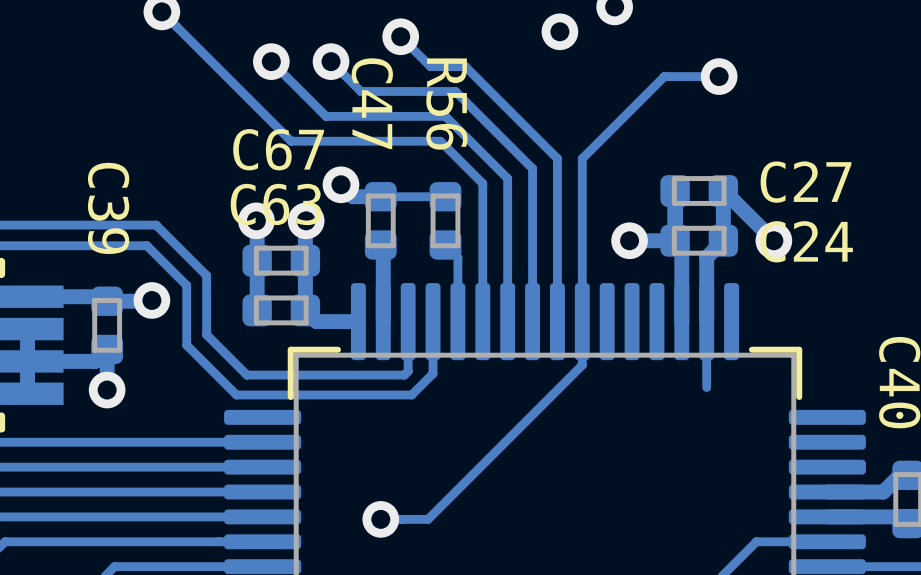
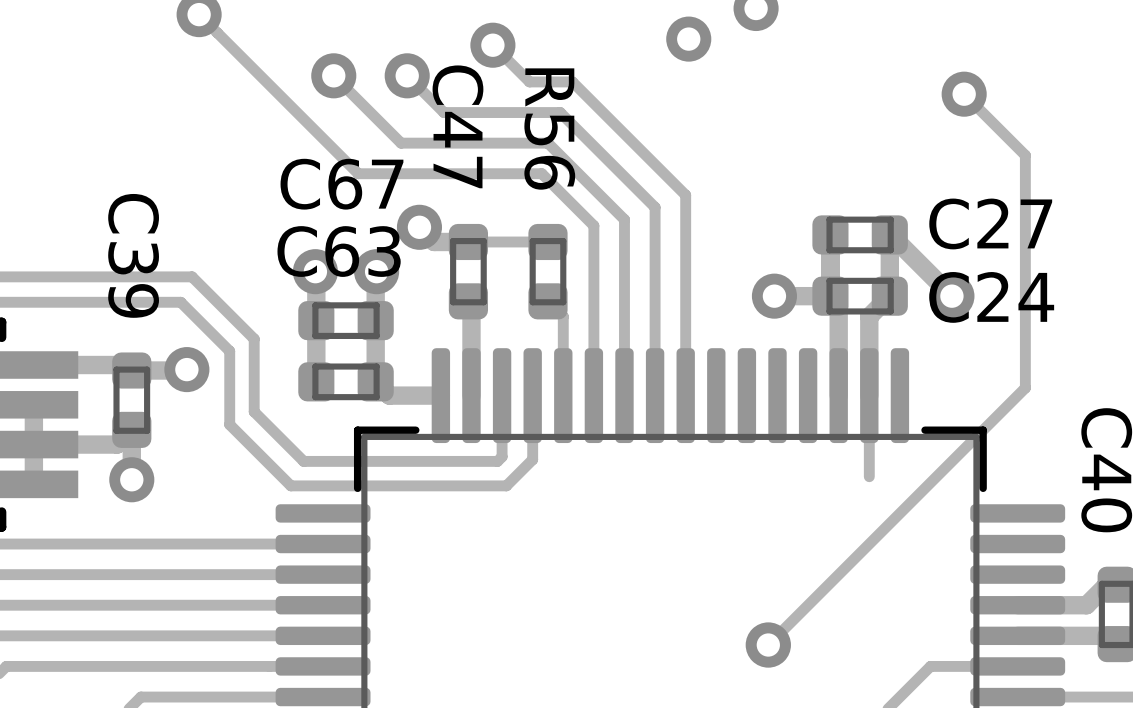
track: (719, 76) (664, 76) (582, 158) (582, 365) (428, 519) (380, 519) -> none
via position: (719, 76) -> (964, 94)
track: none -> (964, 94) (1025, 155) (1025, 387) (768, 645)
via: (380, 519) -> none
via: none -> (768, 645)

